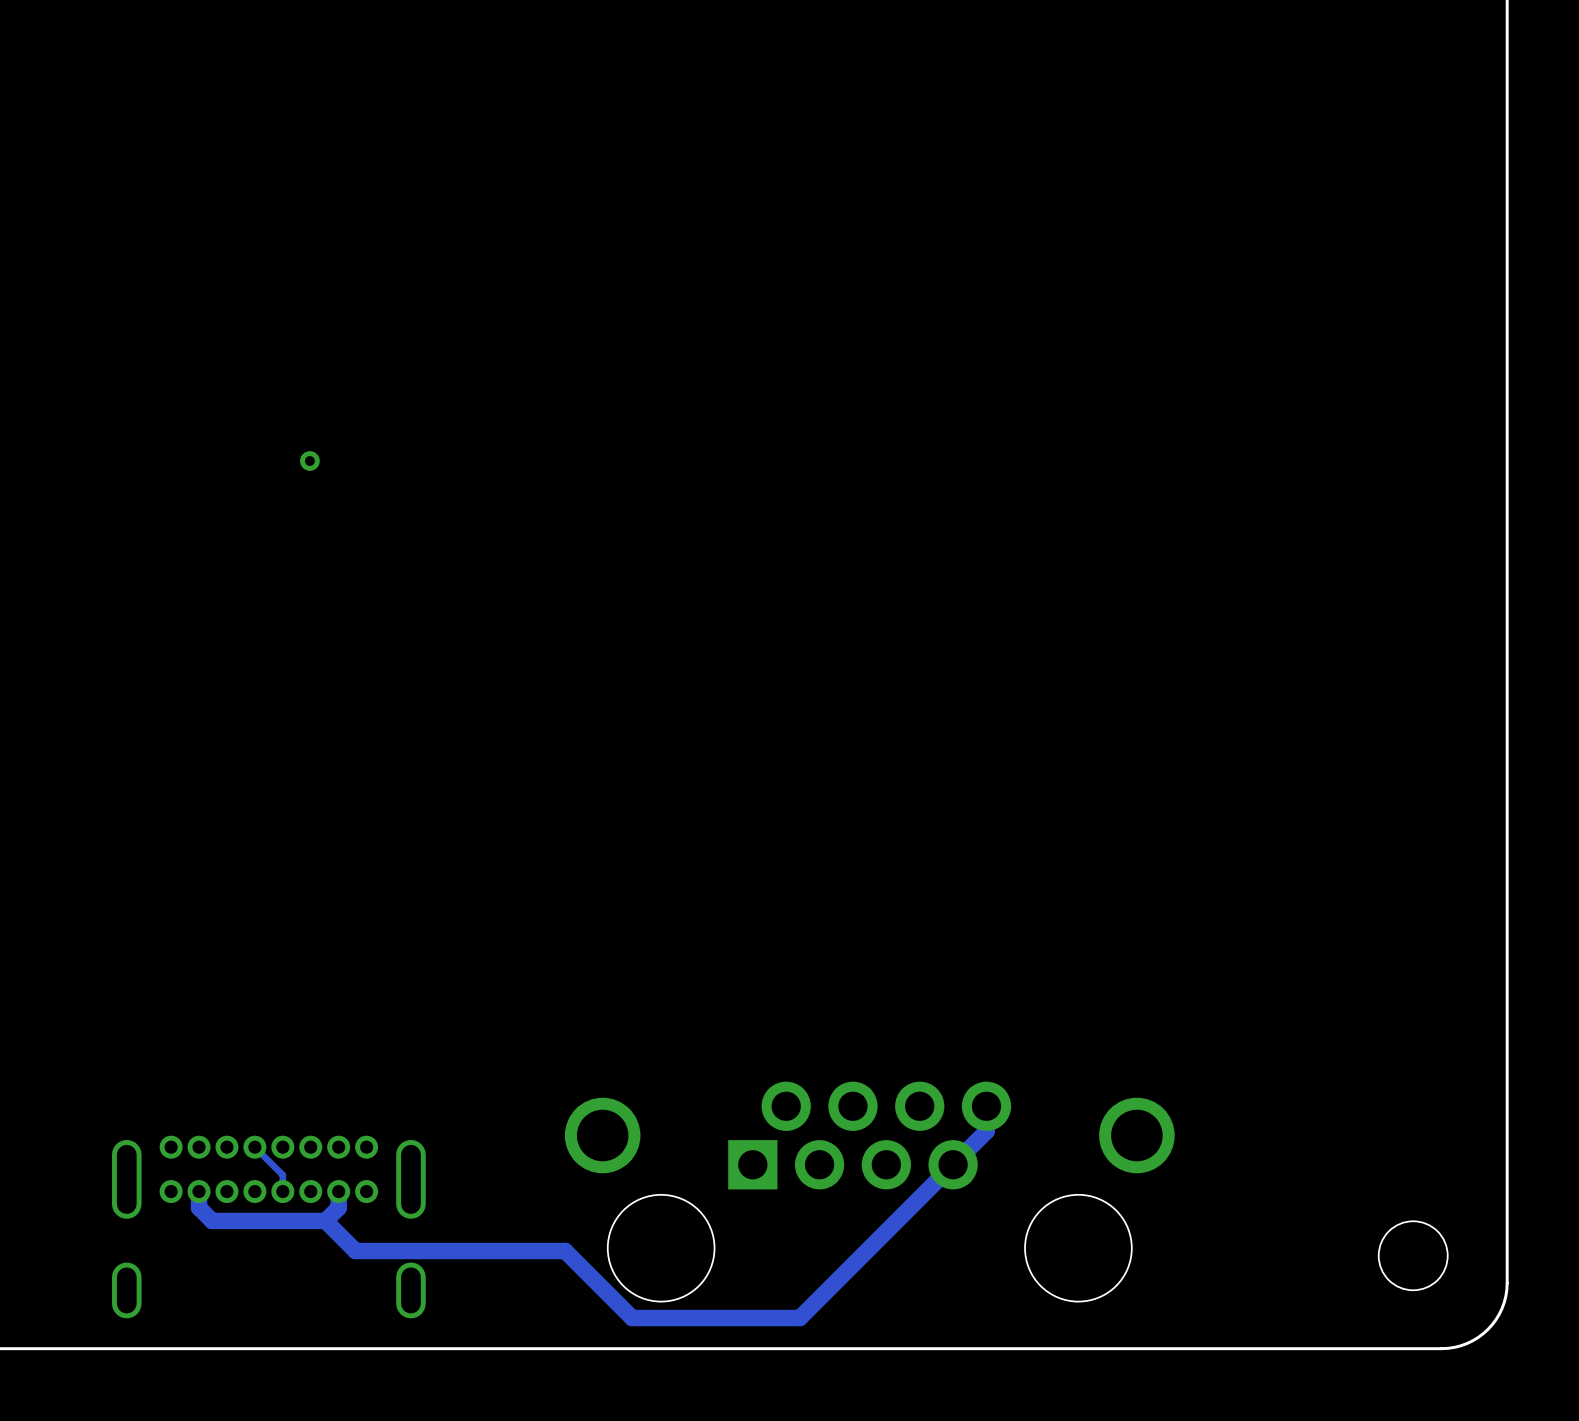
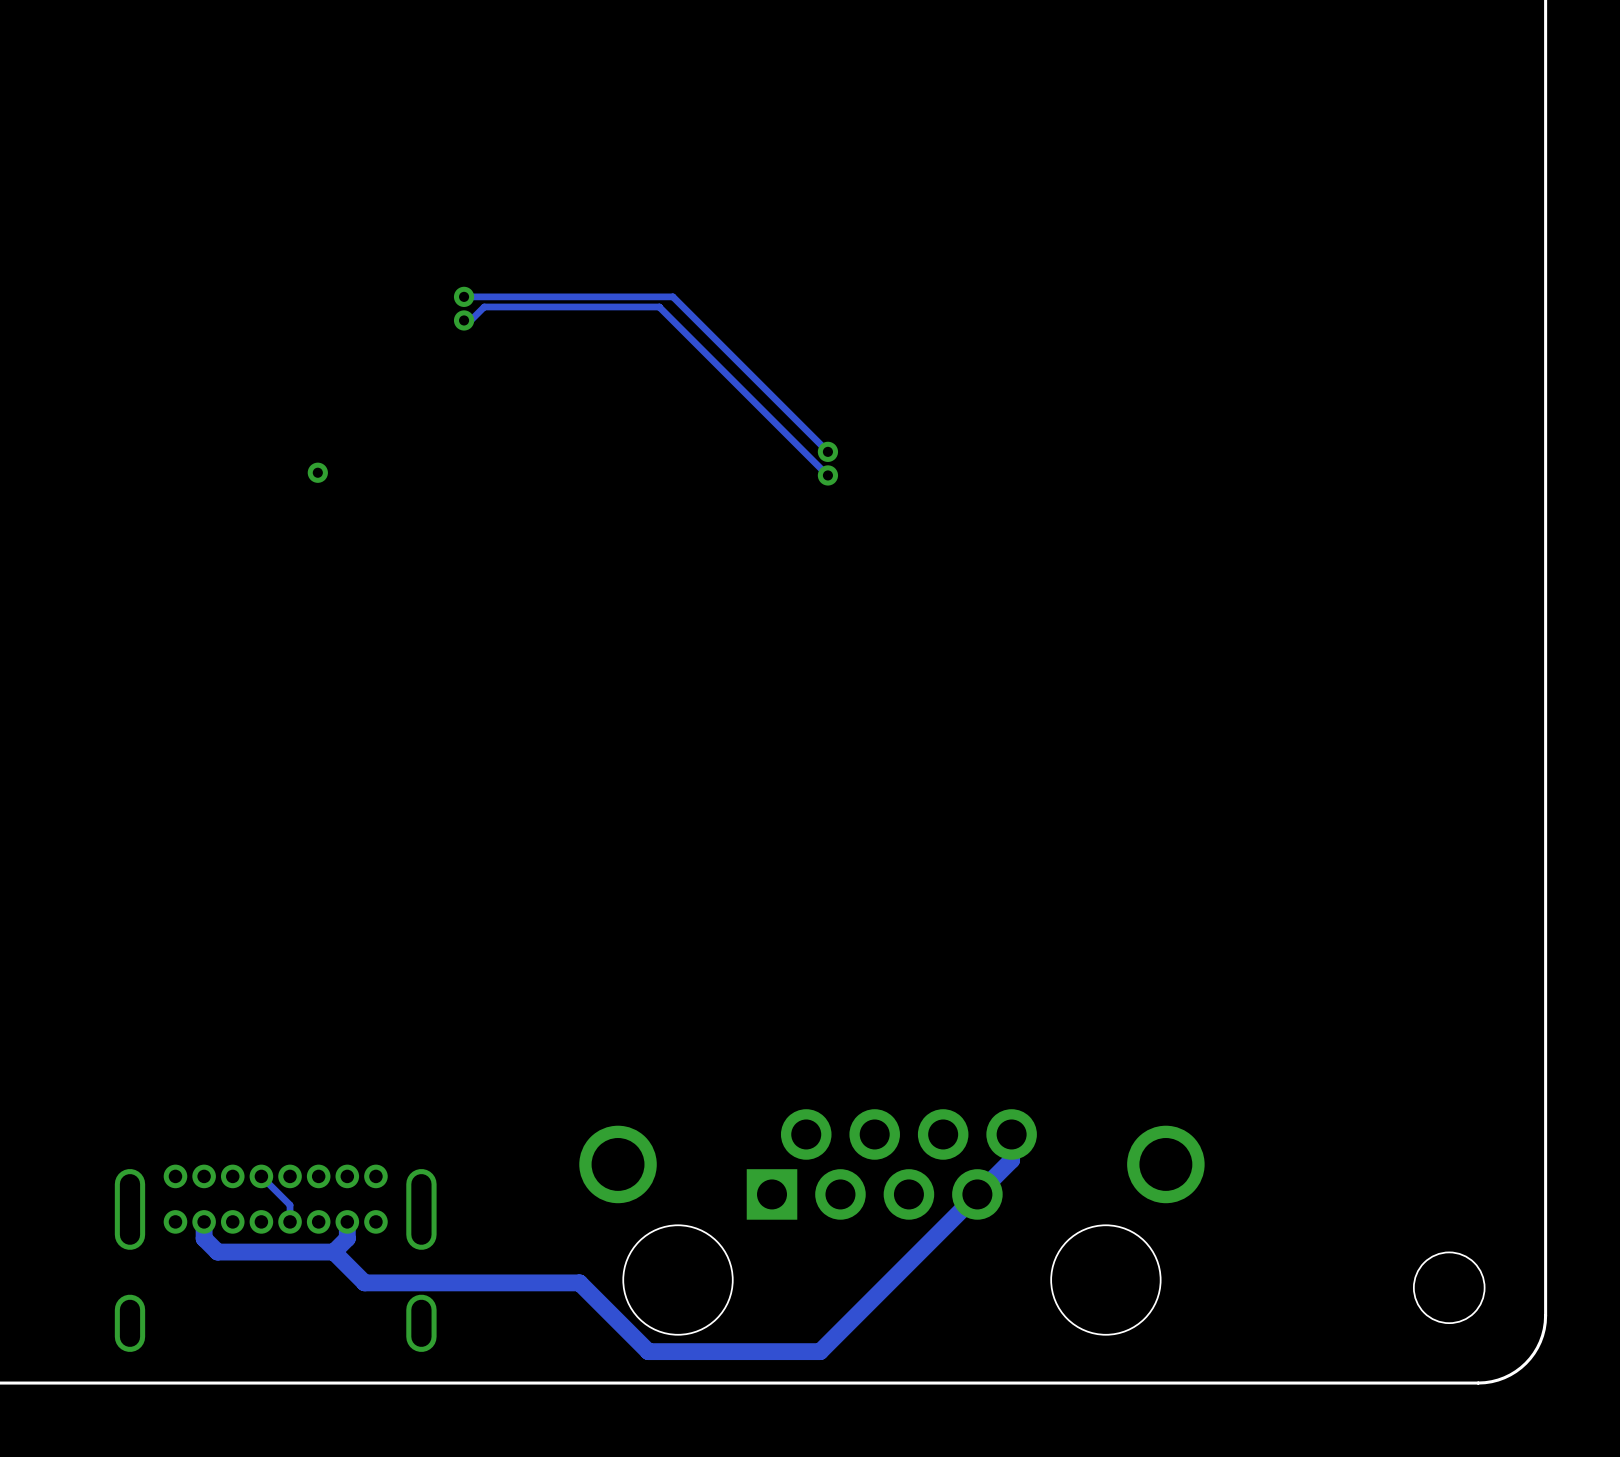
track: none -> (464, 296) (672, 296) (827, 451)
via: none -> (464, 296)
track: none -> (464, 320) (470, 320) (484, 306) (659, 306) (827, 475)
via: none -> (464, 320)
via: none -> (827, 451)
via: none -> (827, 475)

